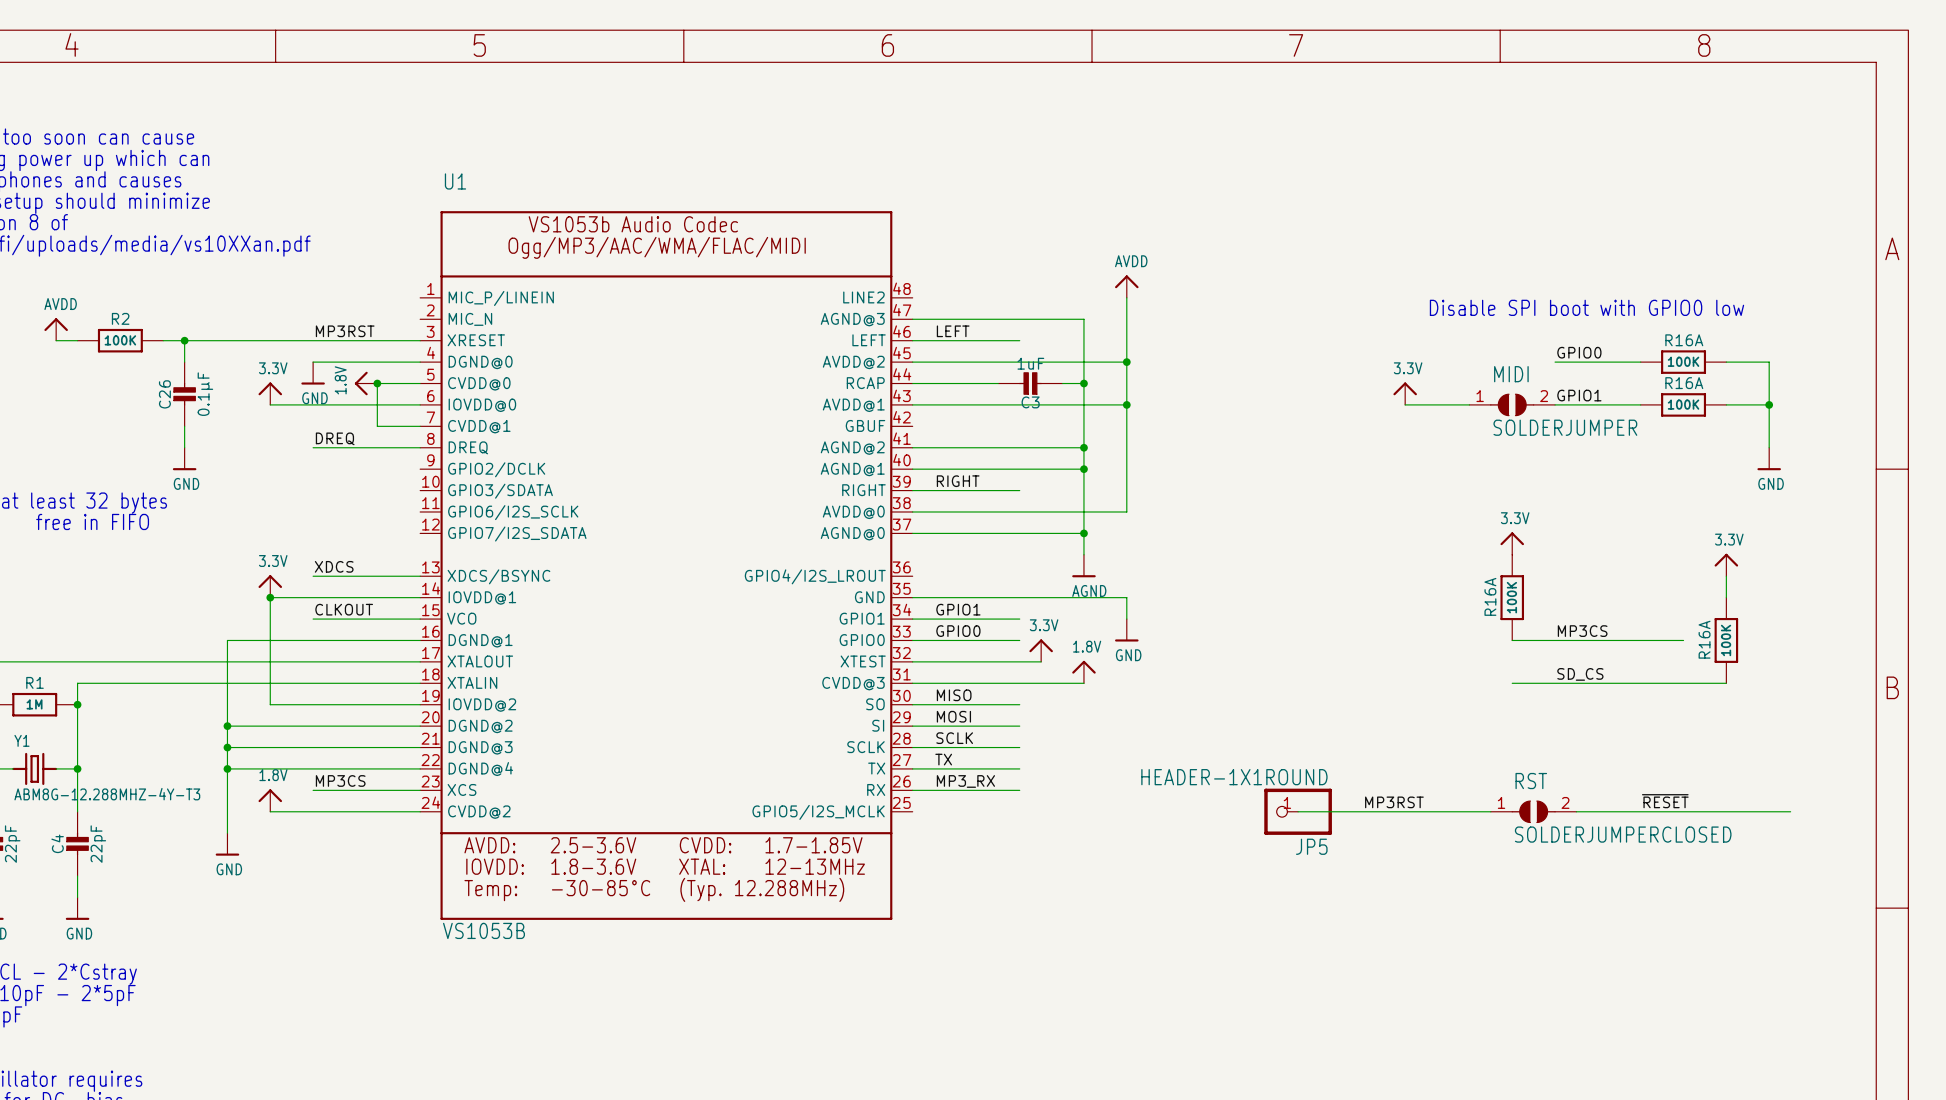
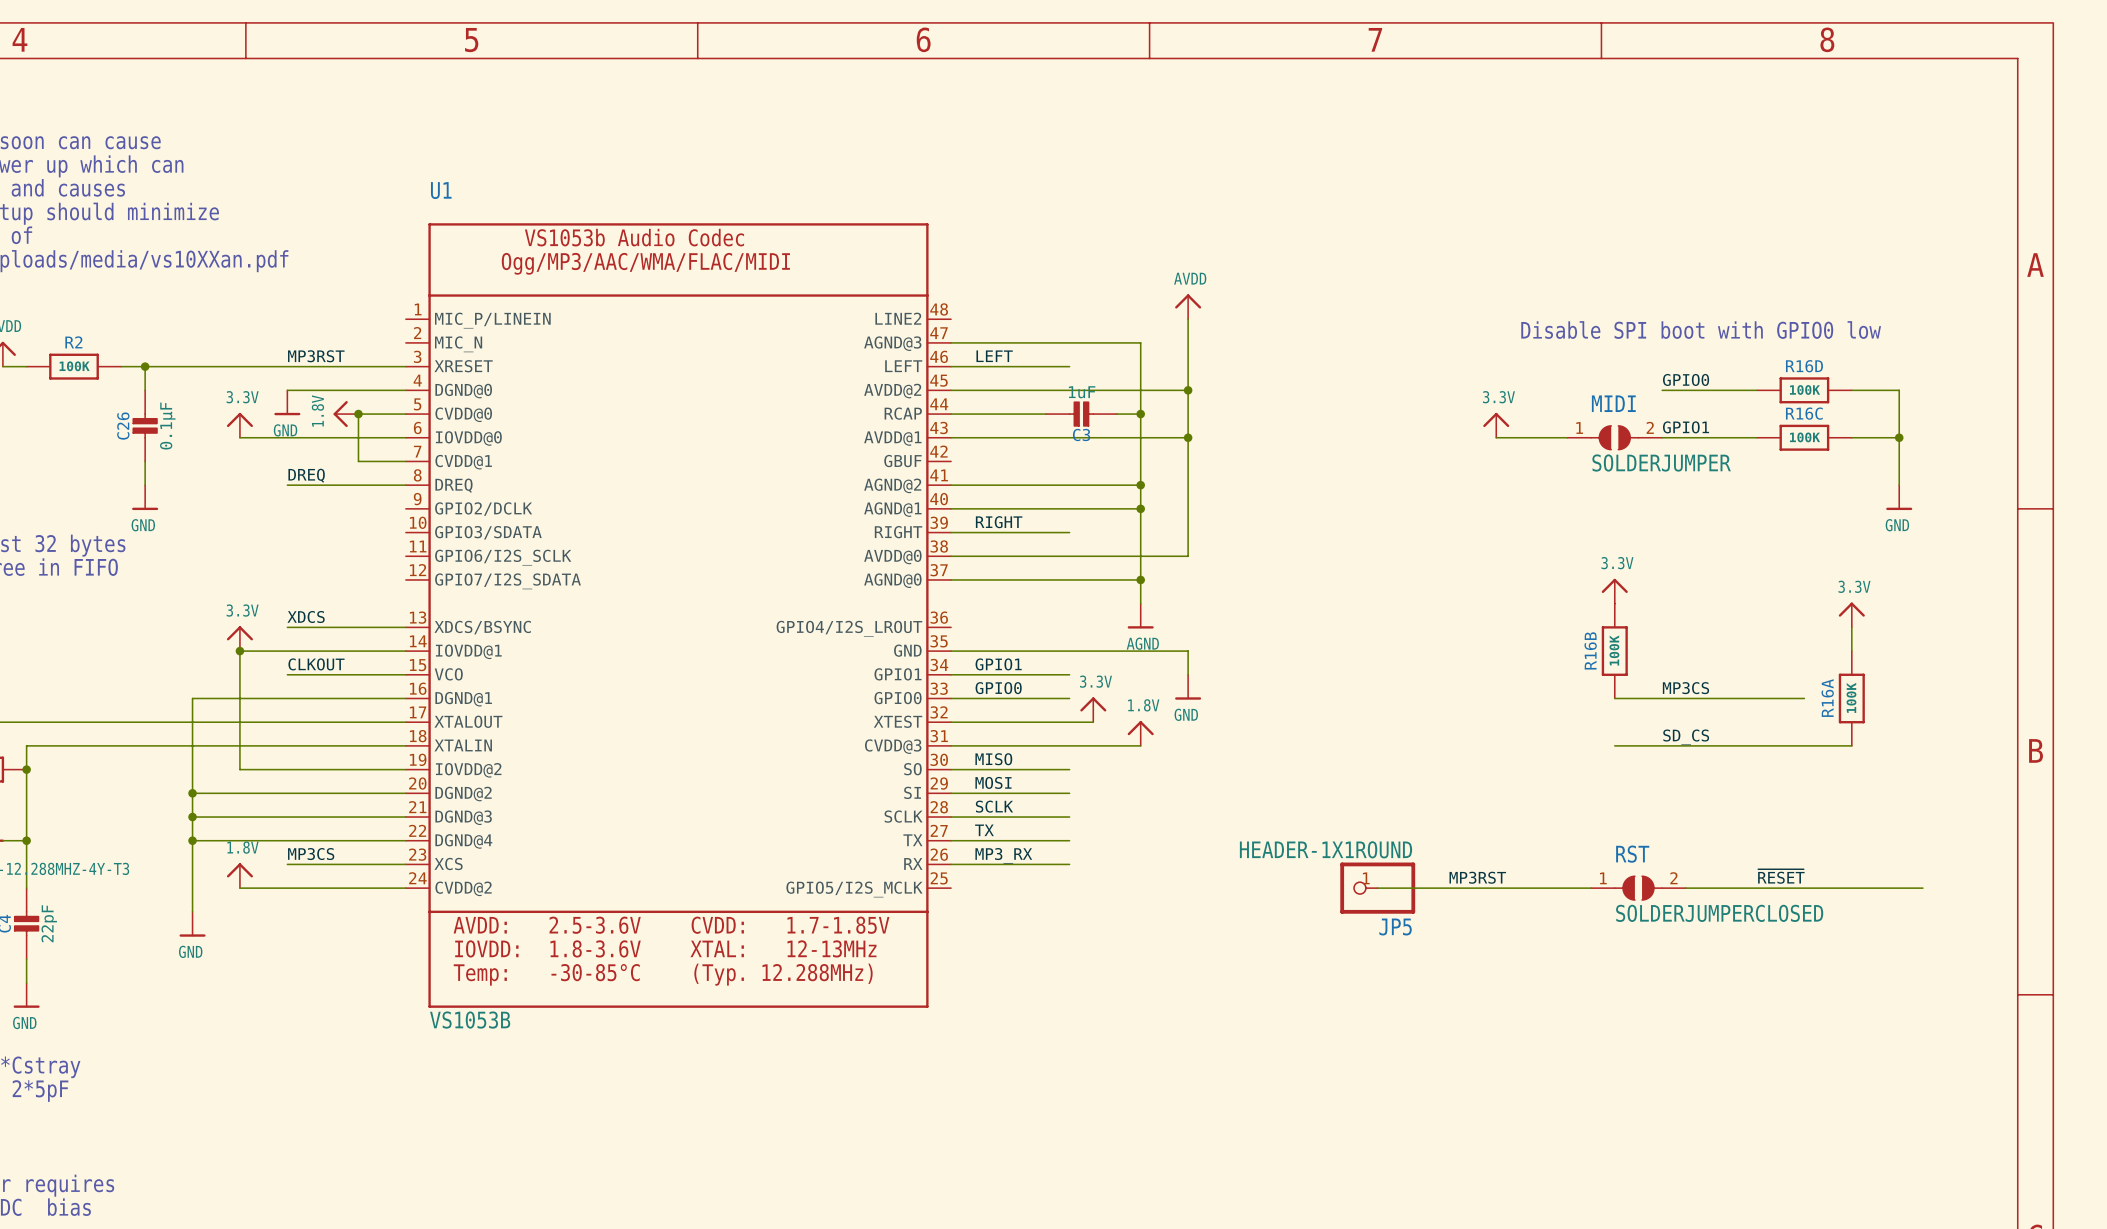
R16A name: R16A (1684, 340) -> R16D (1804, 366)
R16A name: R16A (1684, 383) -> R16C (1804, 413)
R16A name: R16A (1490, 596) -> R16B (1590, 650)

